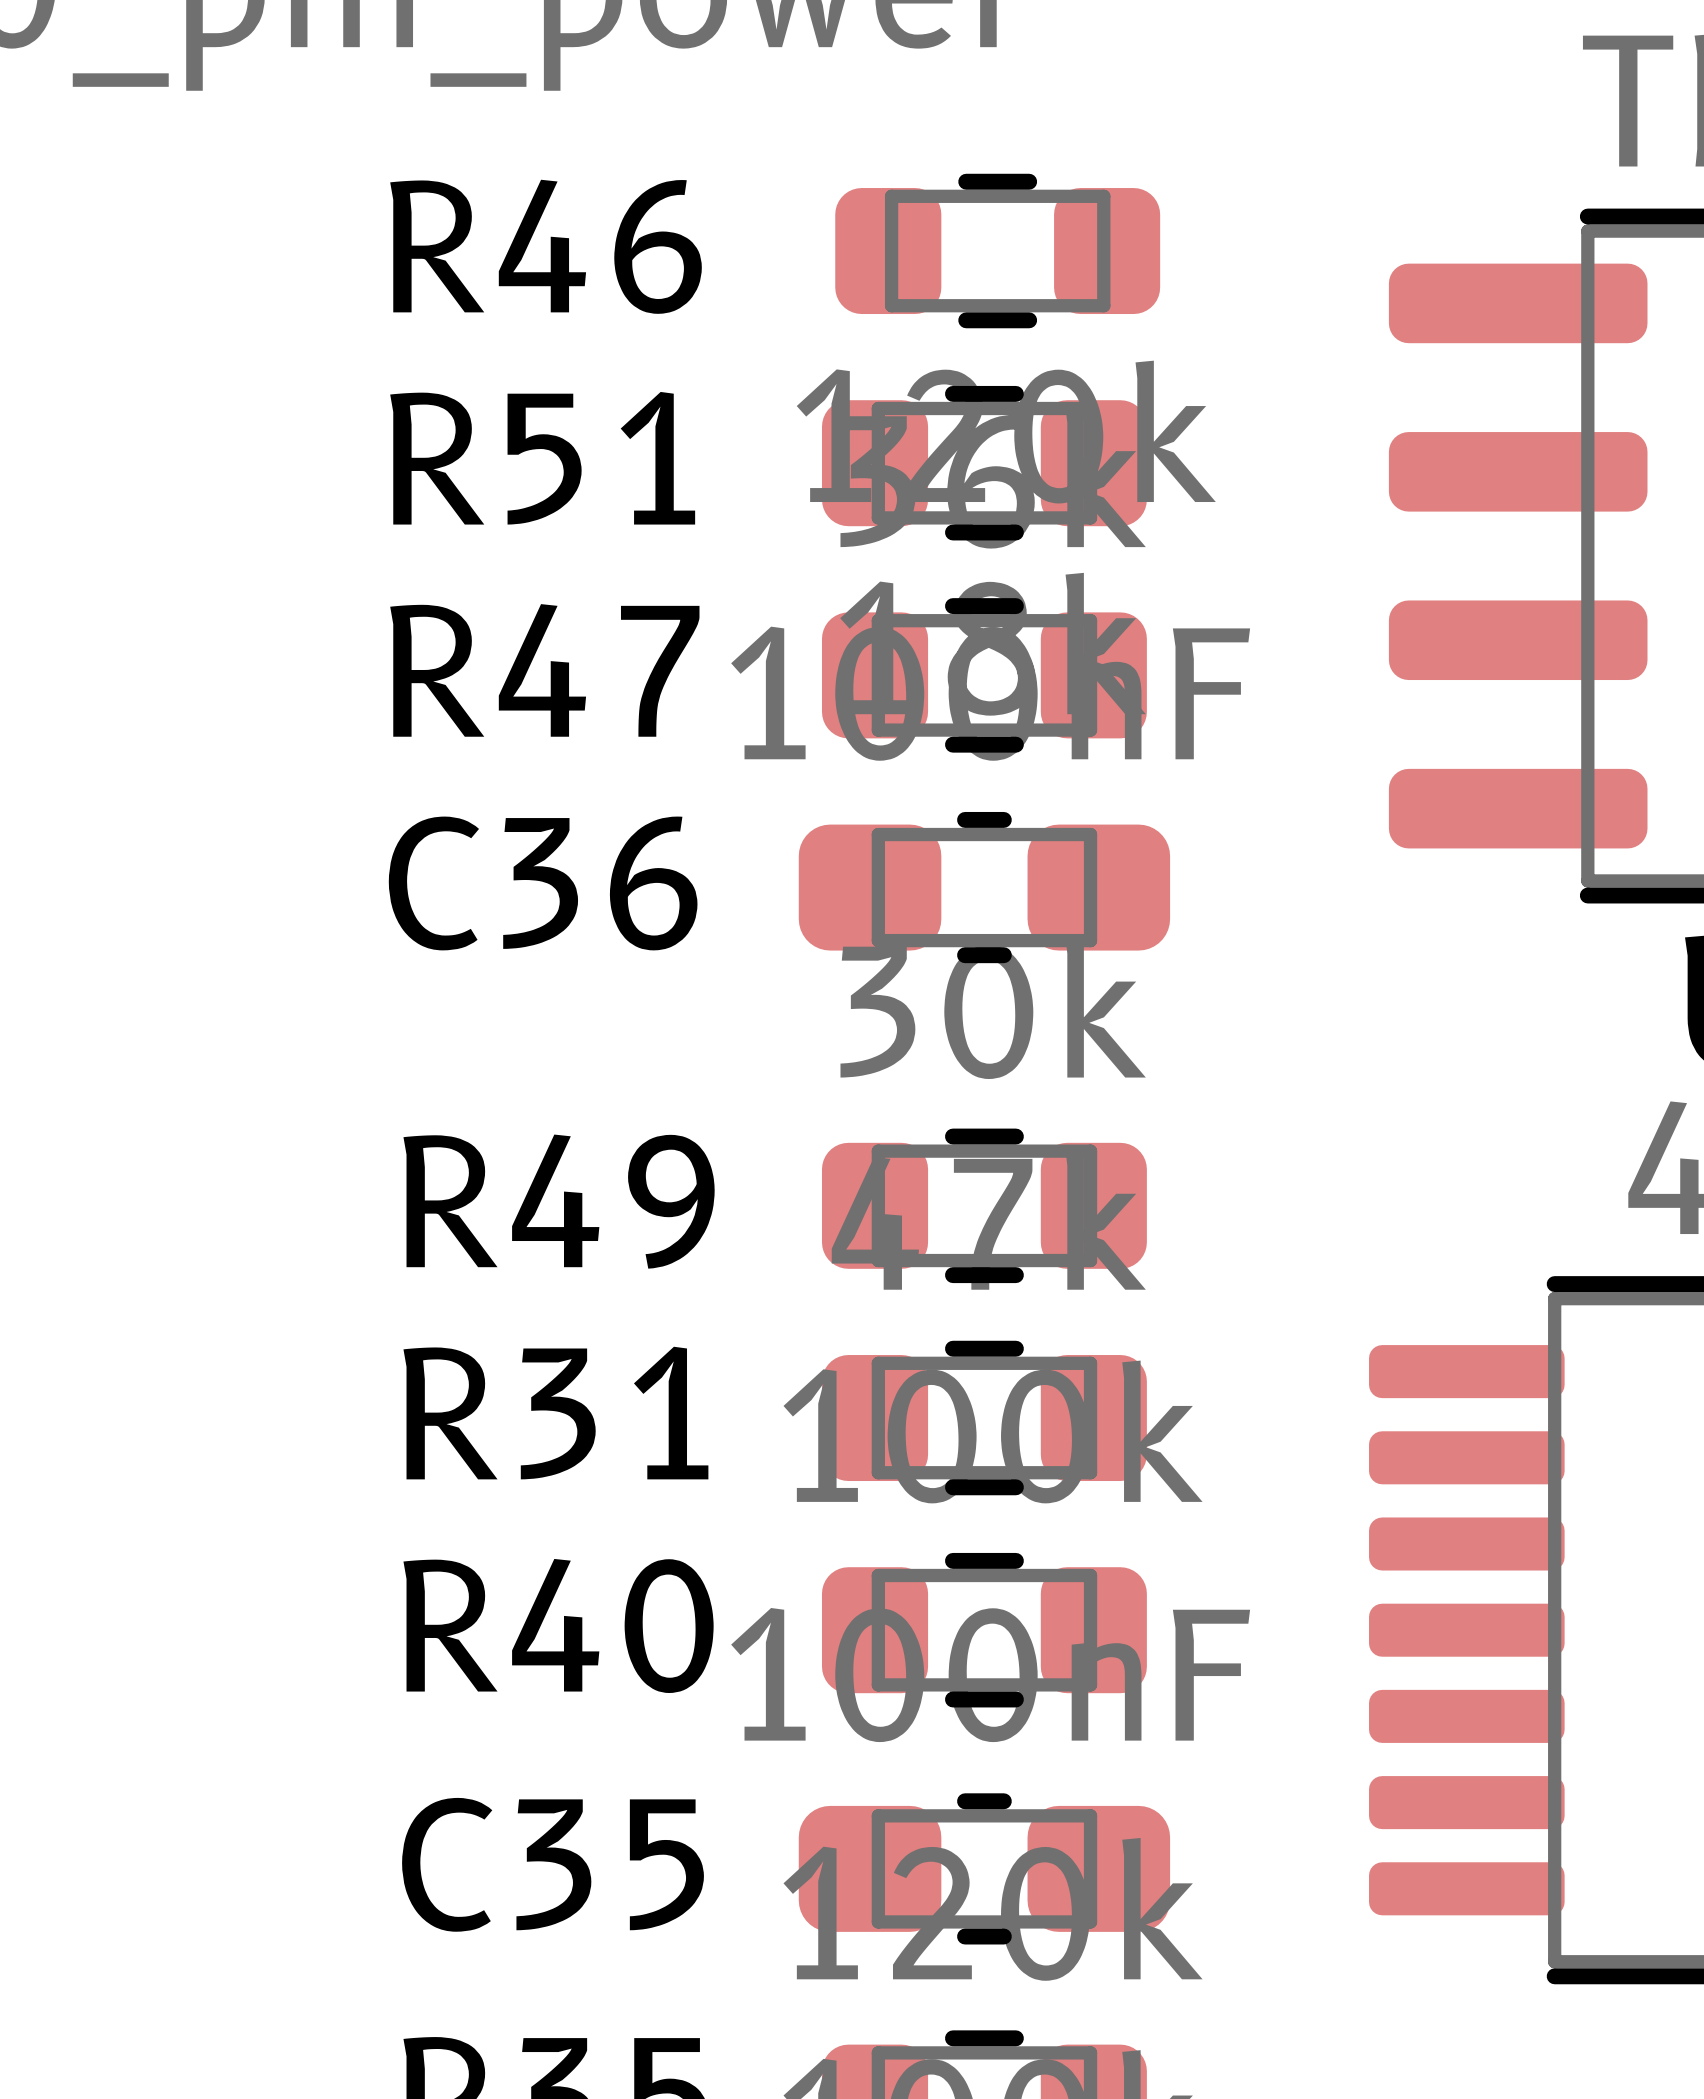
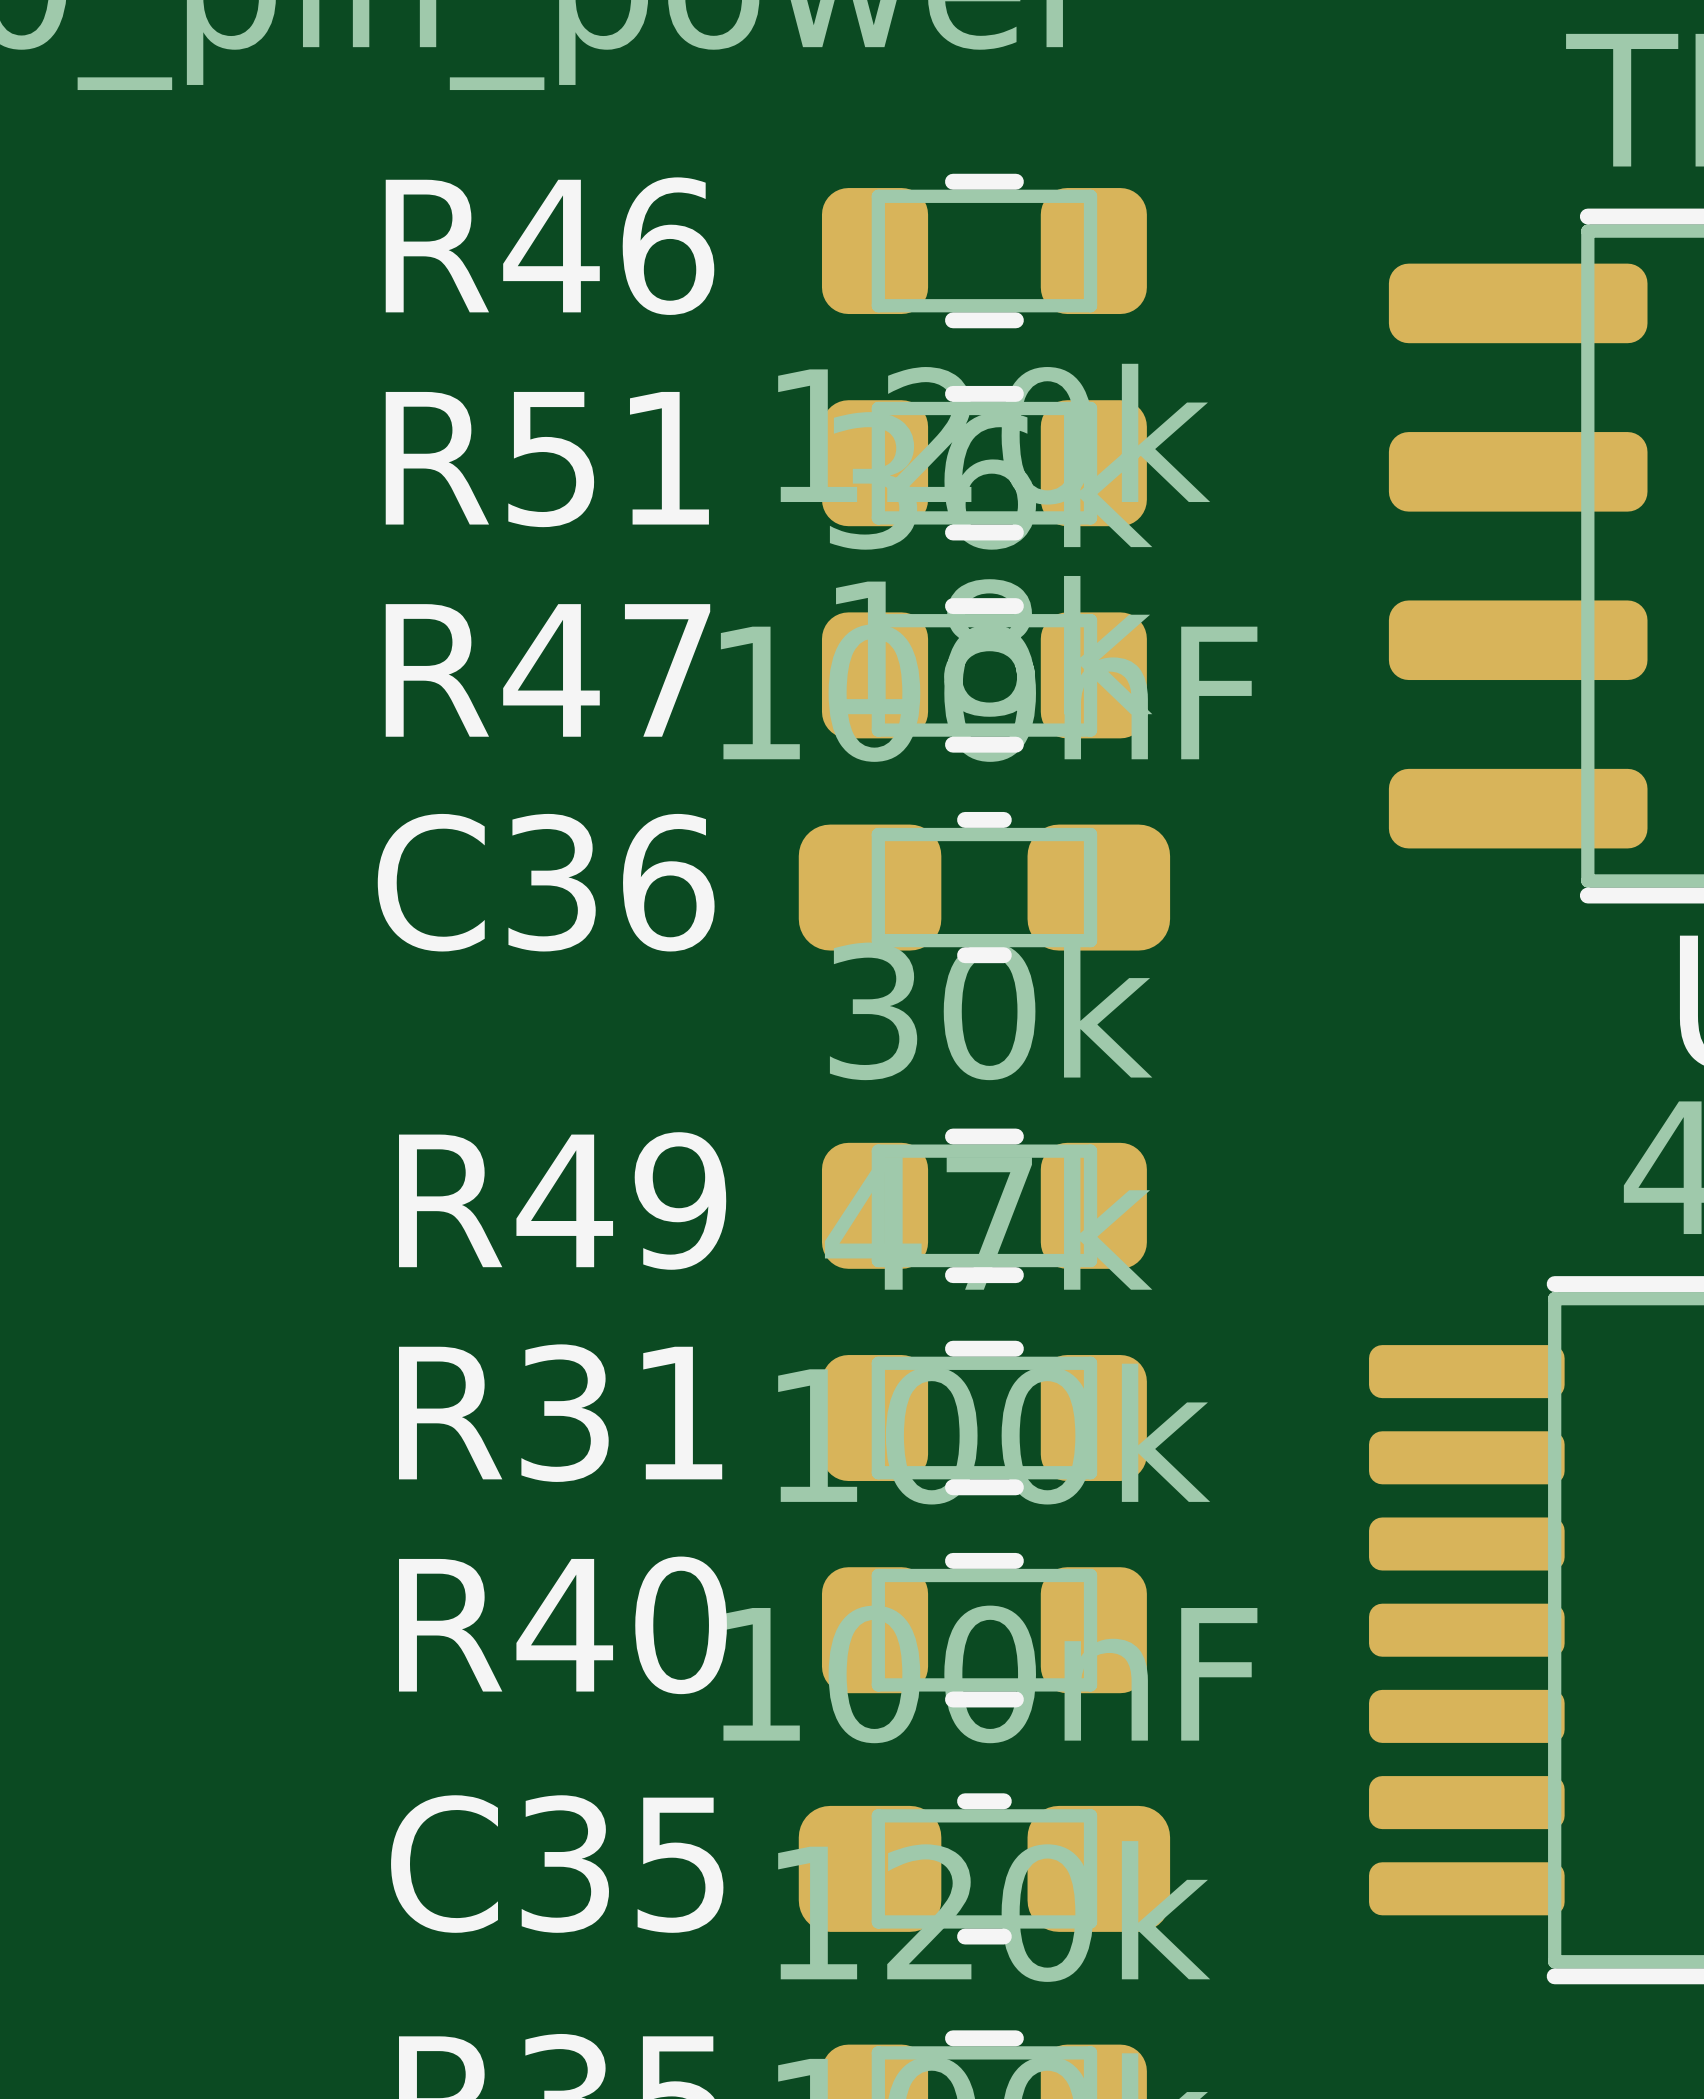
R46 position: (997, 251) -> (984, 251)

